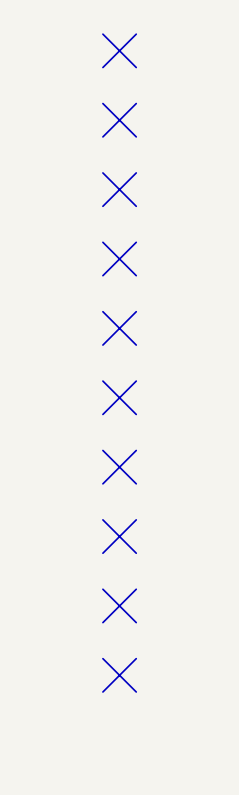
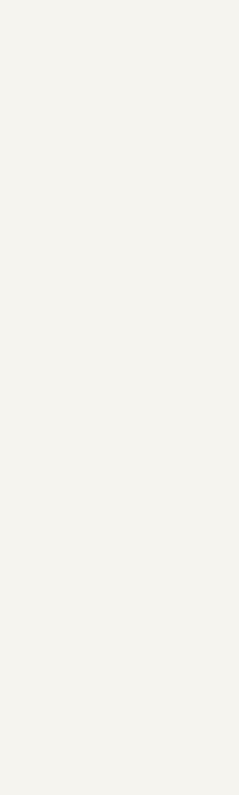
no-connect mark: (119, 50) -> none
no-connect mark: (119, 120) -> none
no-connect mark: (119, 189) -> none
no-connect mark: (119, 259) -> none
no-connect mark: (119, 328) -> none
no-connect mark: (119, 397) -> none
no-connect mark: (119, 467) -> none
no-connect mark: (119, 536) -> none
no-connect mark: (119, 605) -> none
no-connect mark: (119, 675) -> none

